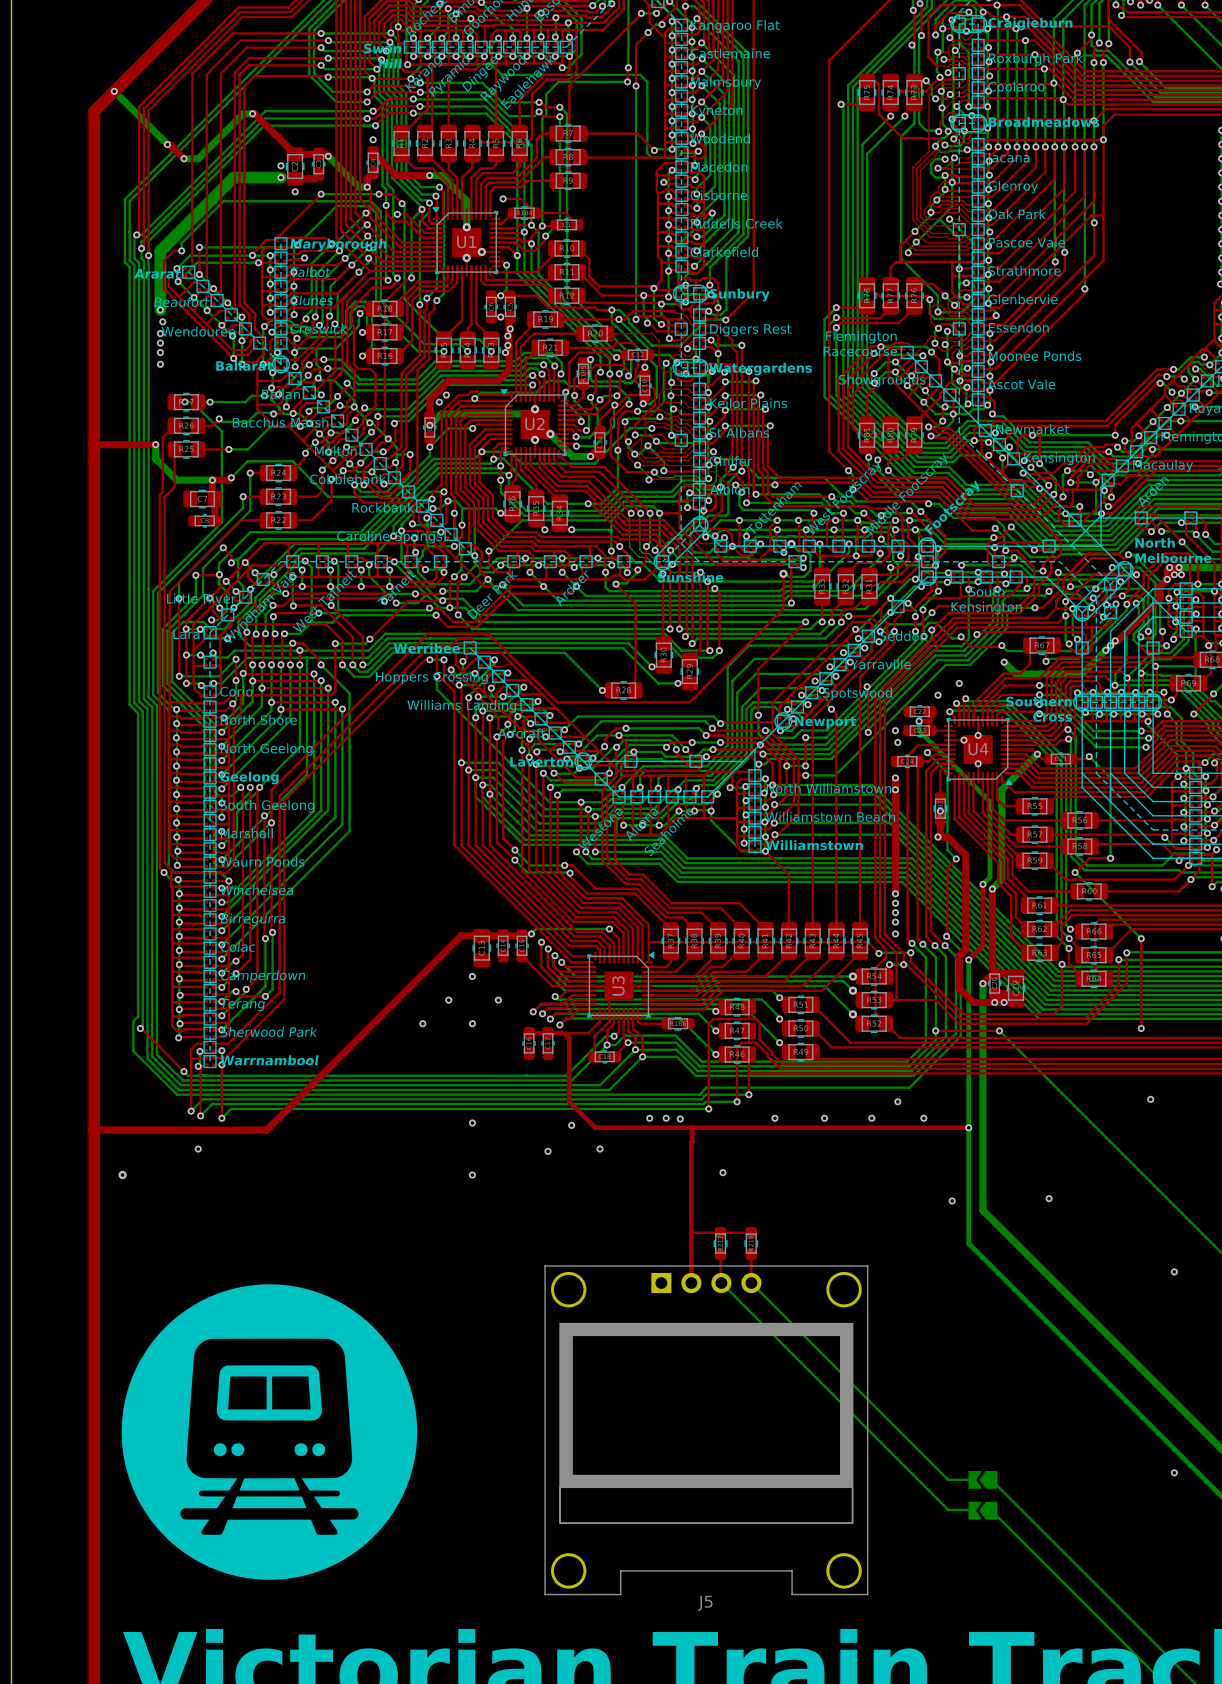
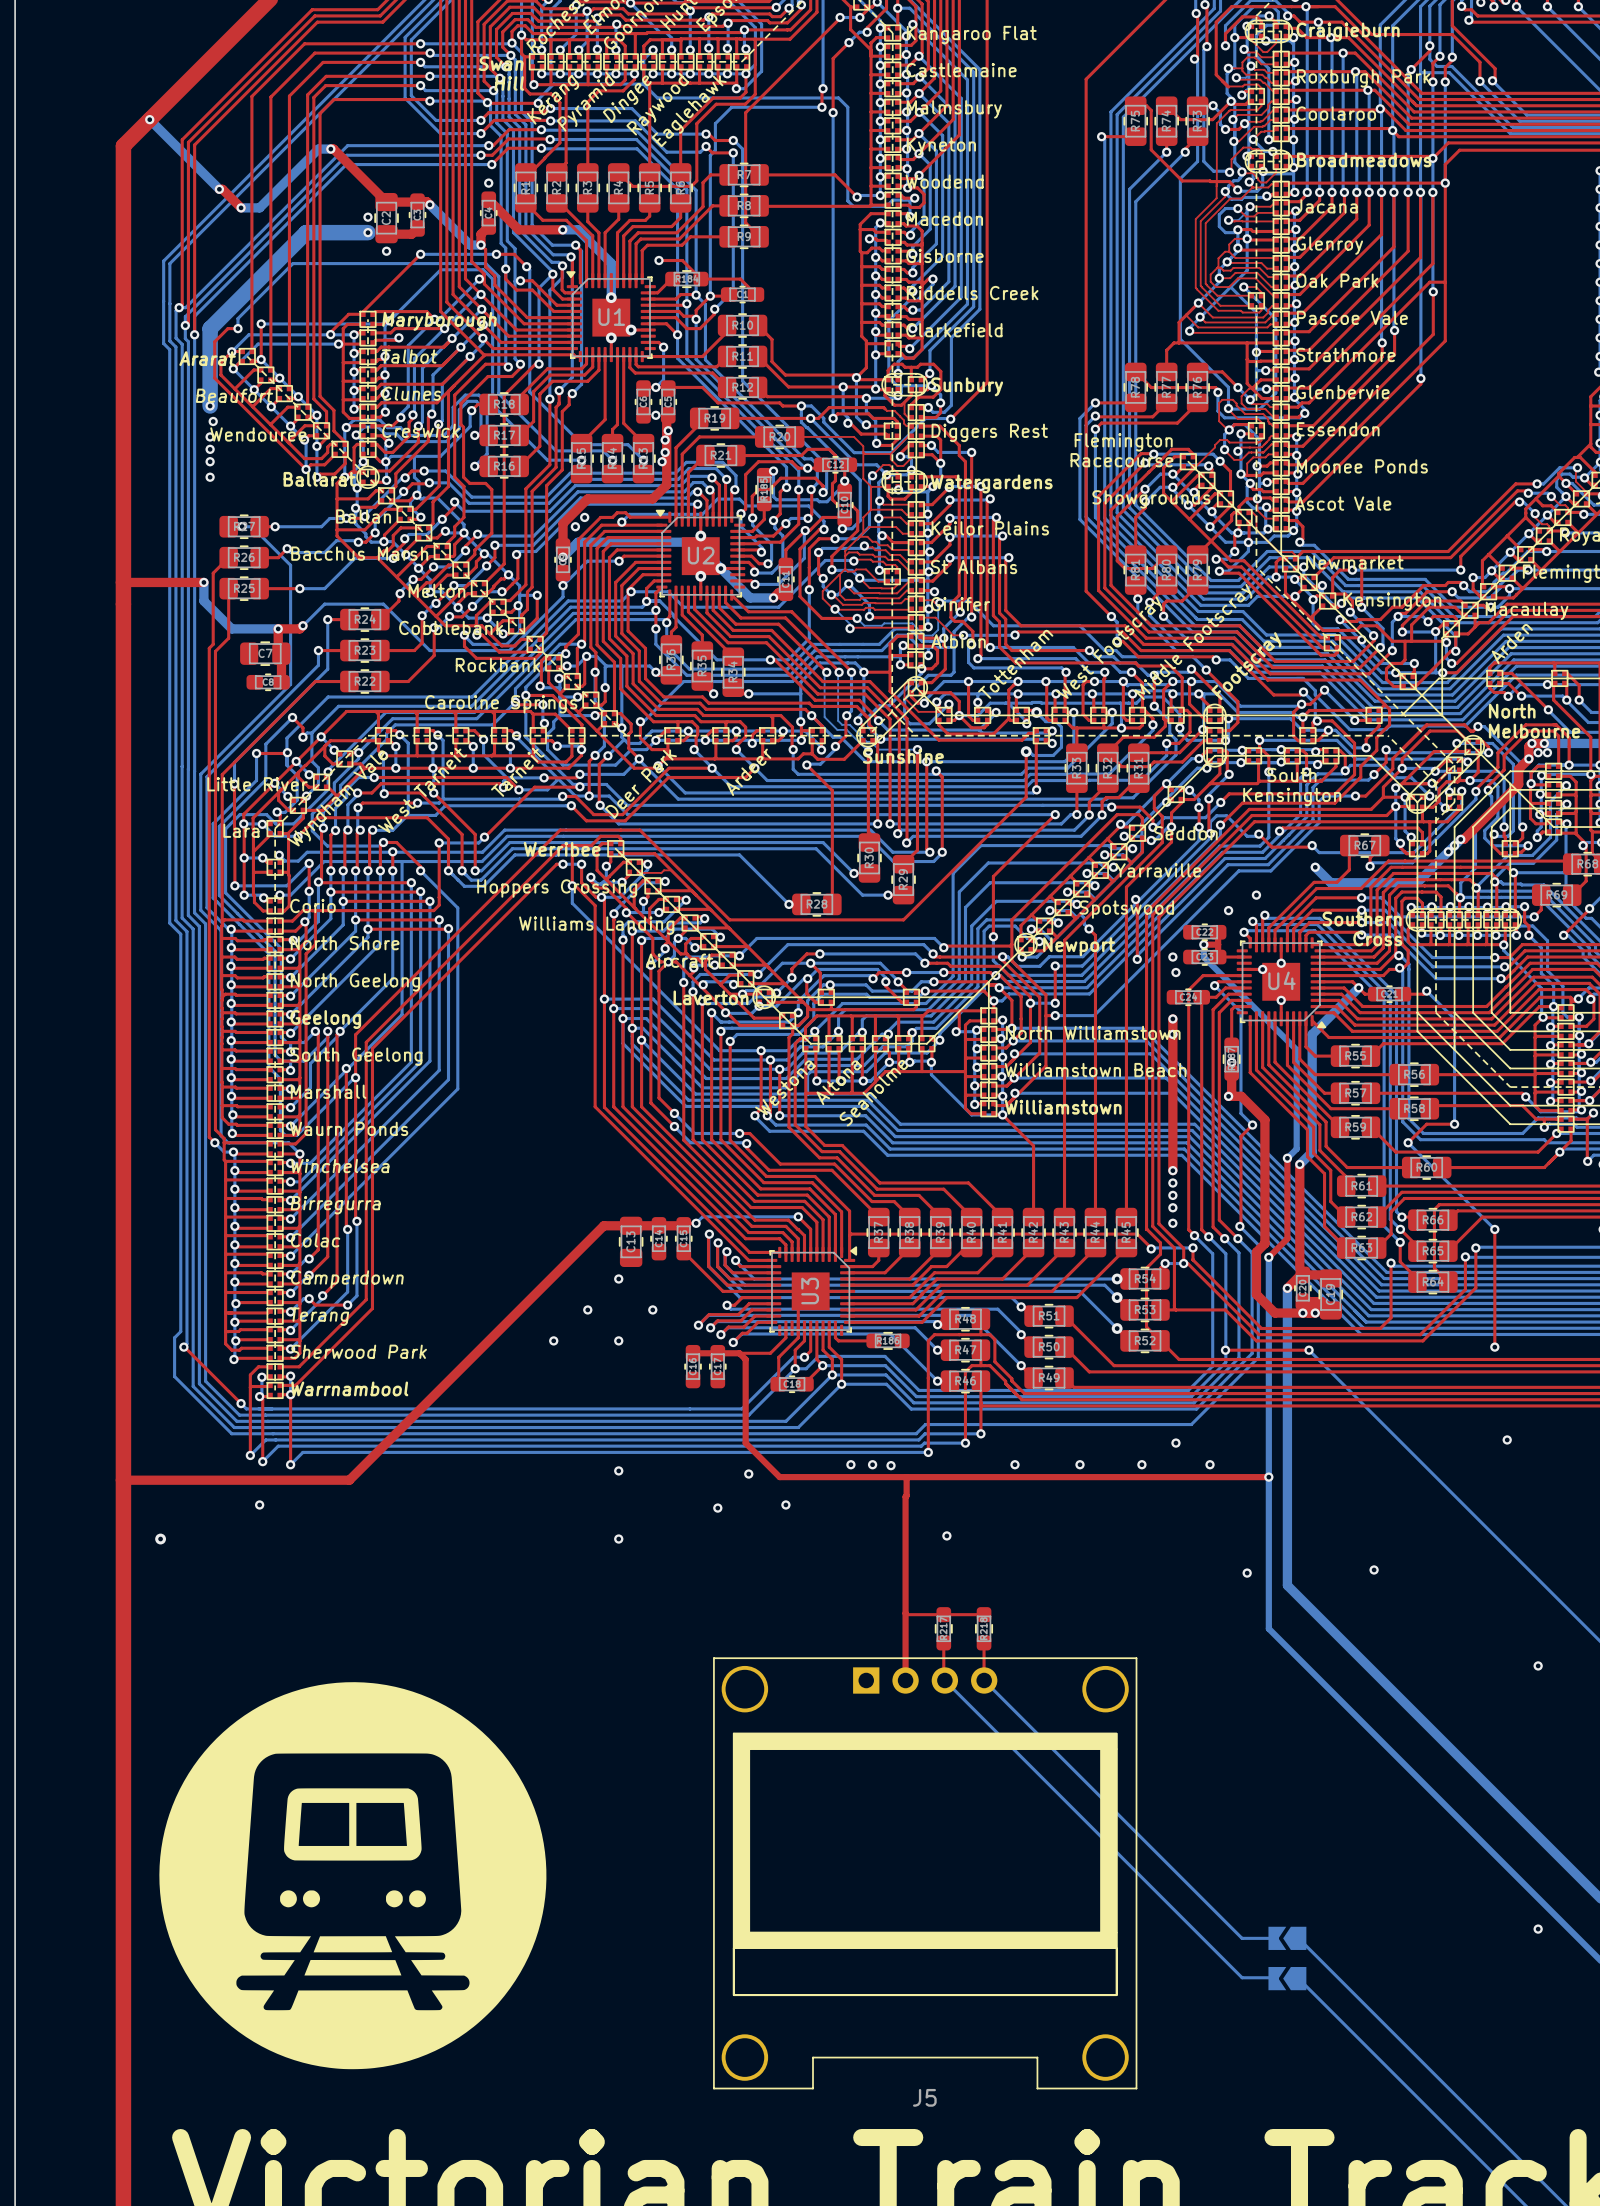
J5 footprint: [544, 1265, 869, 1596] -> [713, 1657, 1138, 2090]

